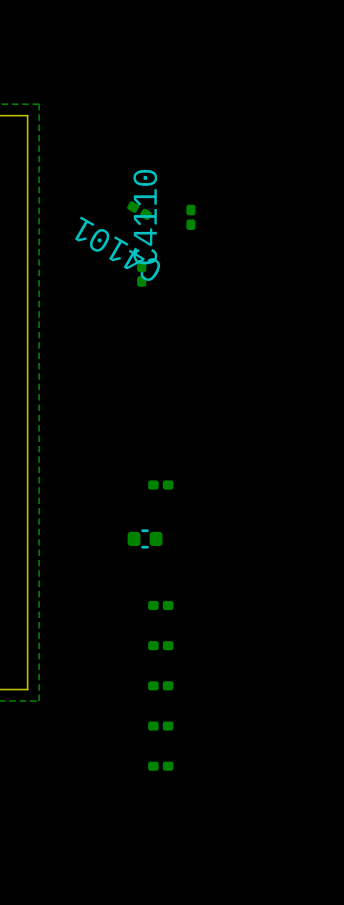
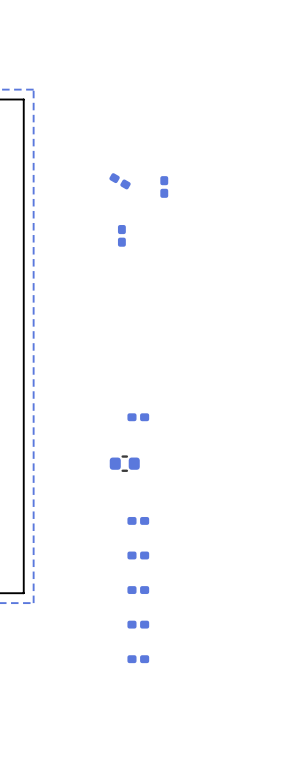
C4110 name: C4110 (145, 217) -> none
C4101 name: C4101 (117, 249) -> none

